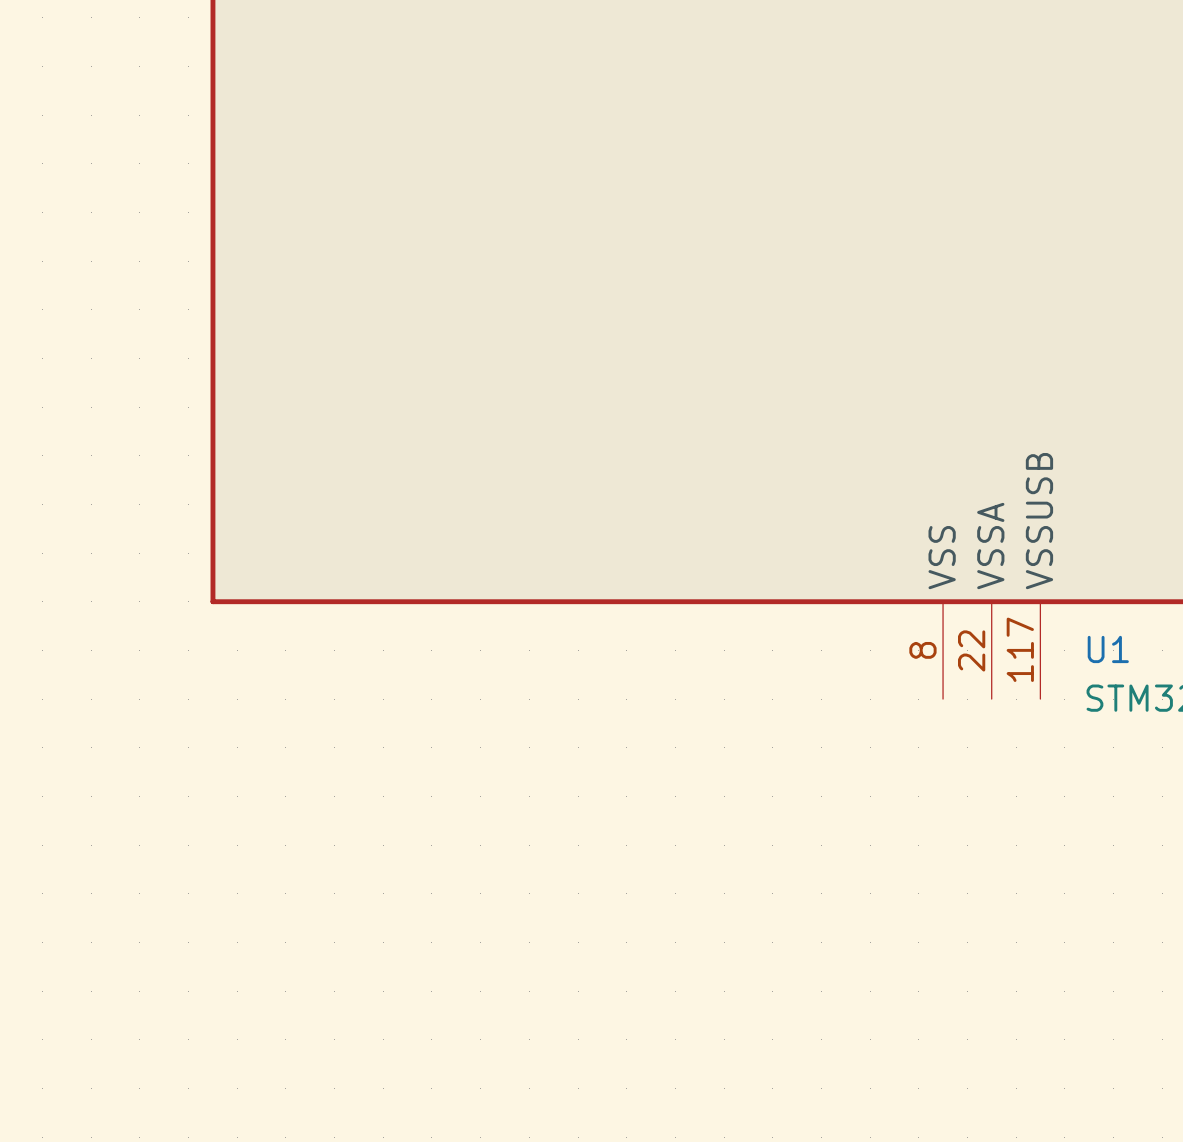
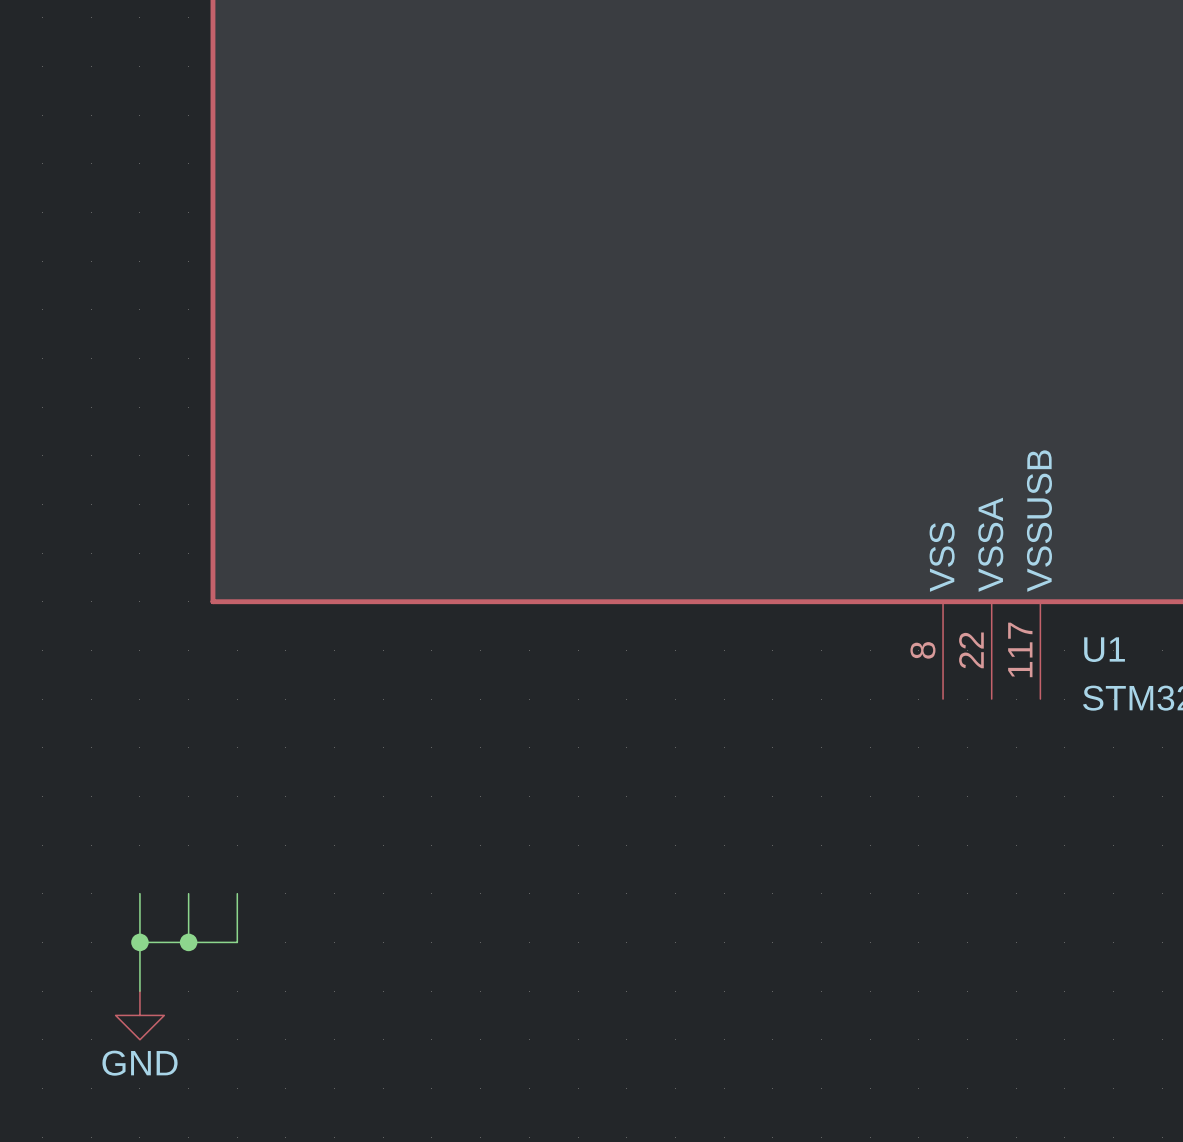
wire: none -> (139, 893) (139, 991)
wire: none -> (188, 893) (188, 942)
wire: none -> (237, 893) (237, 942) (139, 942)
junction: none -> (139, 942)
junction: none -> (188, 942)
power symbol: none -> GND (139, 1015)

